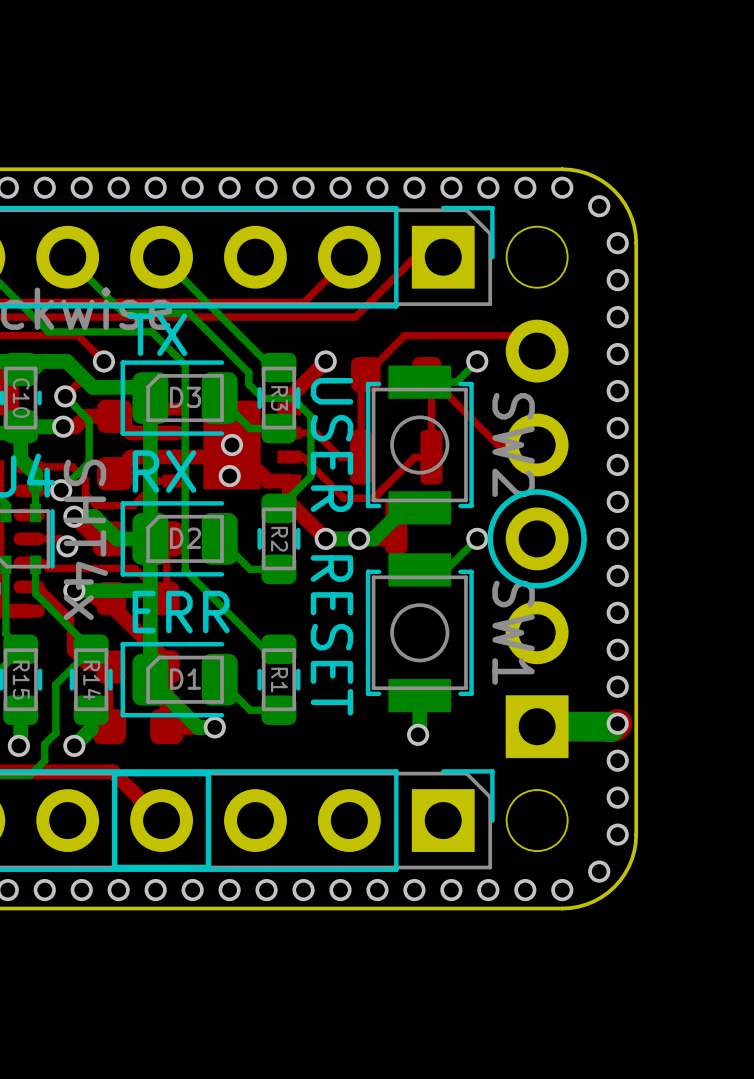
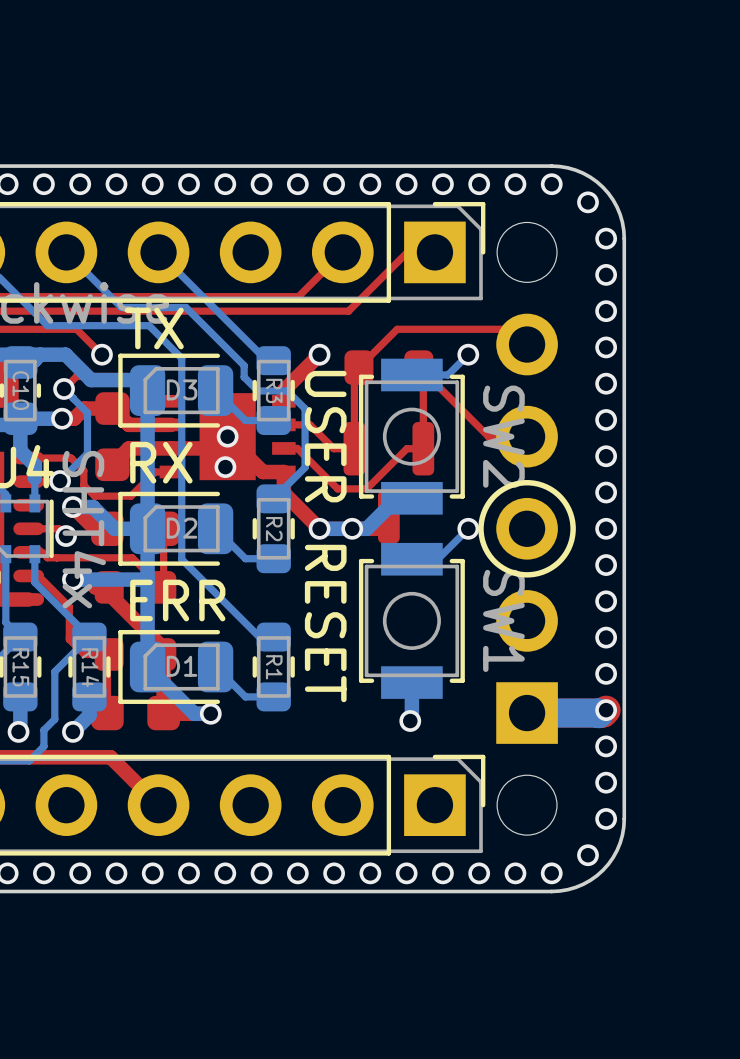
line: (208, 773) (114, 773) (114, 867) (208, 867) (208, 773) -> none

